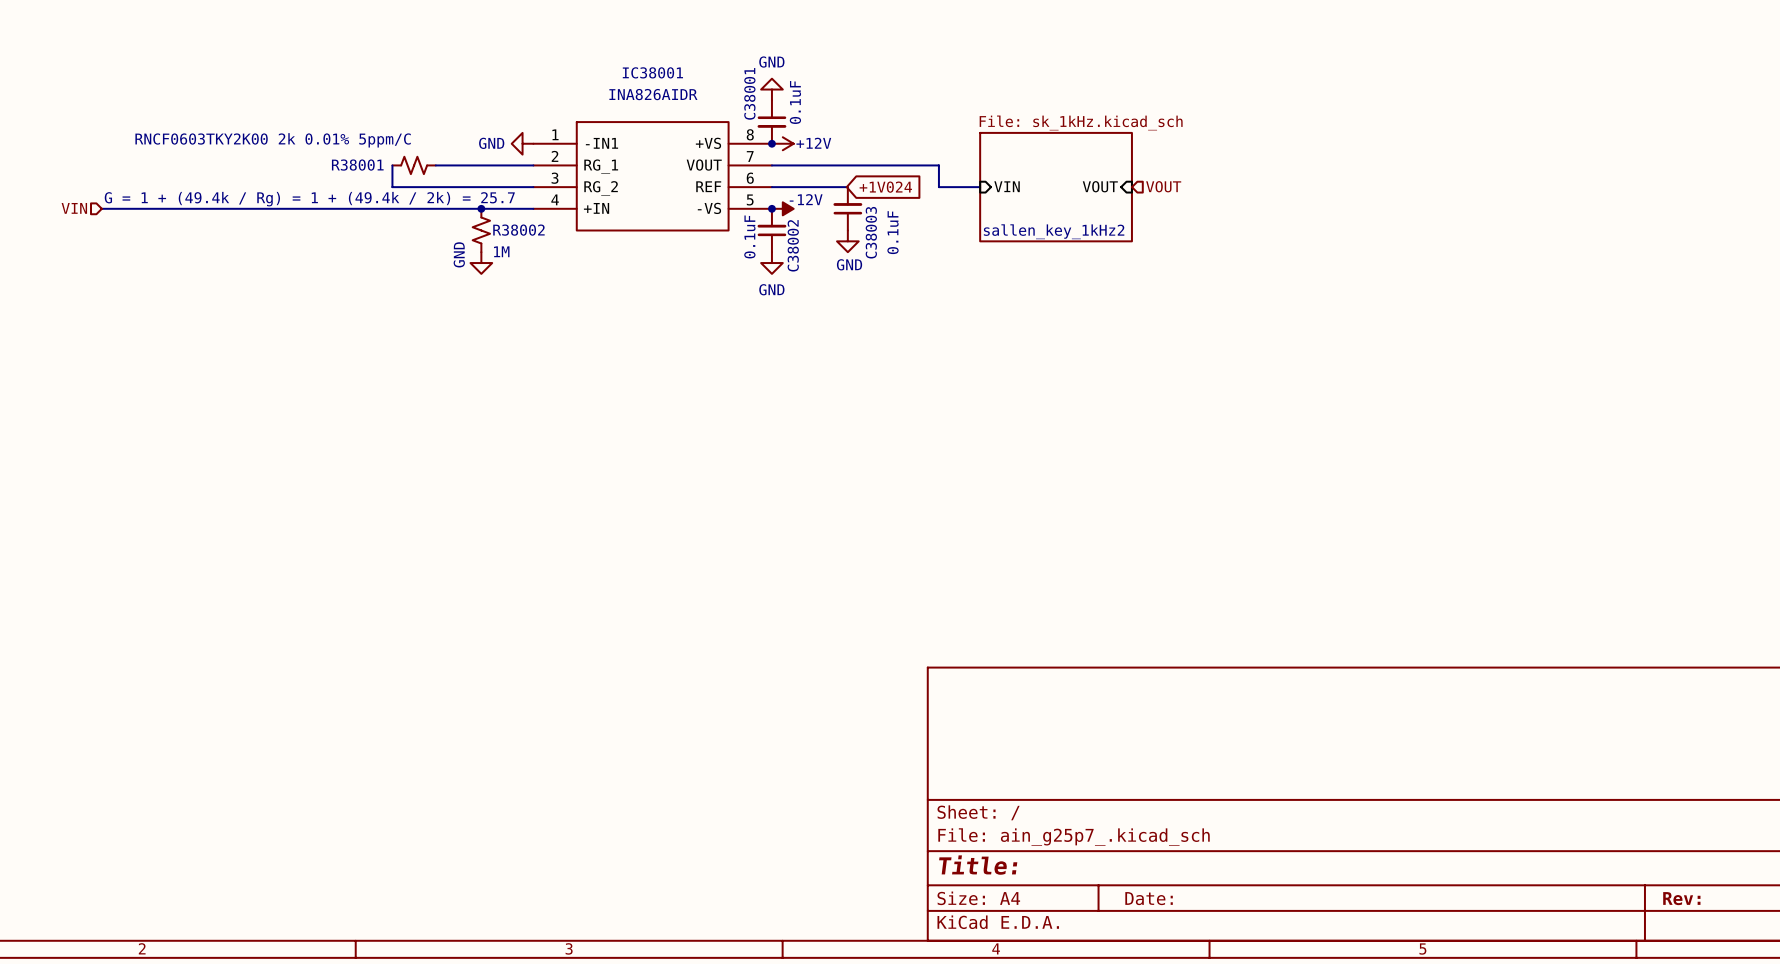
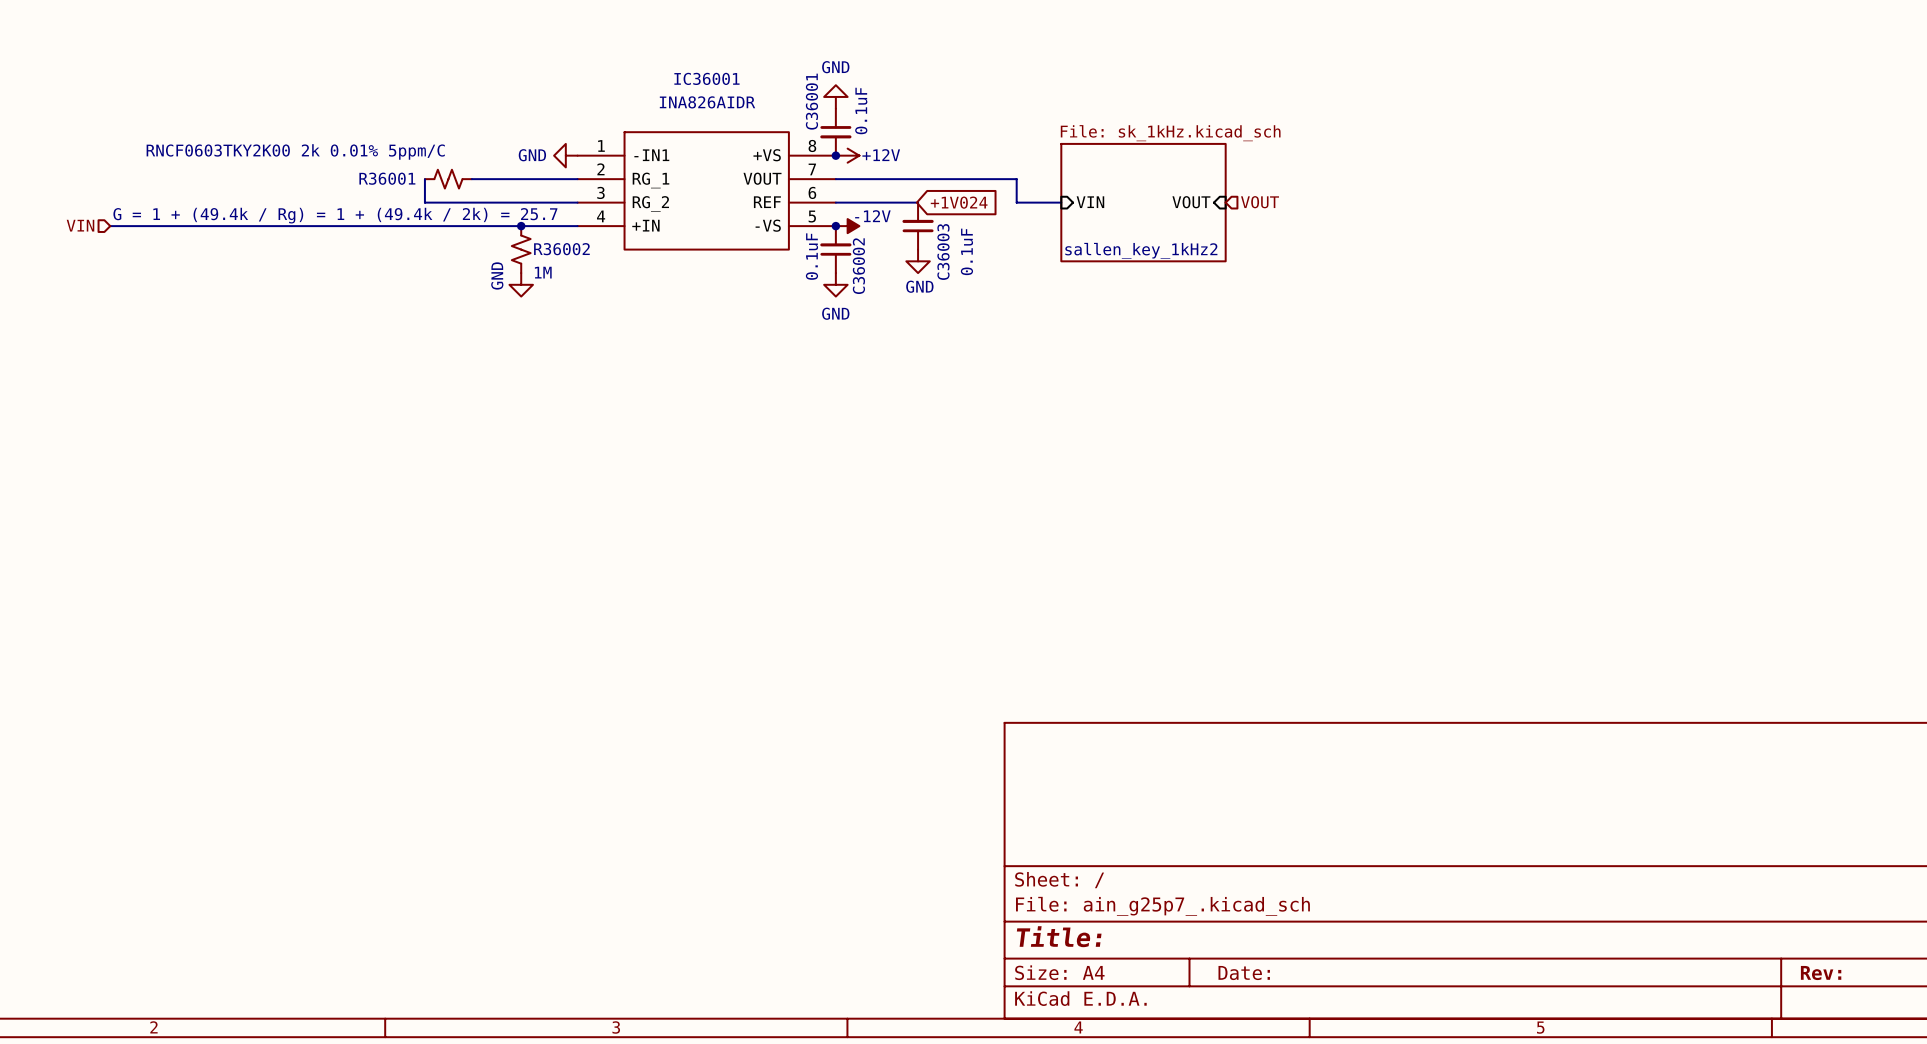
IC38001 name: IC38001 (652, 72) -> IC36001 (706, 78)
C38001 name: C38001 (749, 93) -> C36001 (811, 101)
R38001 name: R38001 (357, 165) -> R36001 (387, 178)
R38002 name: R38002 (518, 230) -> R36002 (561, 249)
C38003 name: C38003 (871, 232) -> C36003 (943, 251)
C38002 name: C38002 (793, 245) -> C36002 (858, 266)

